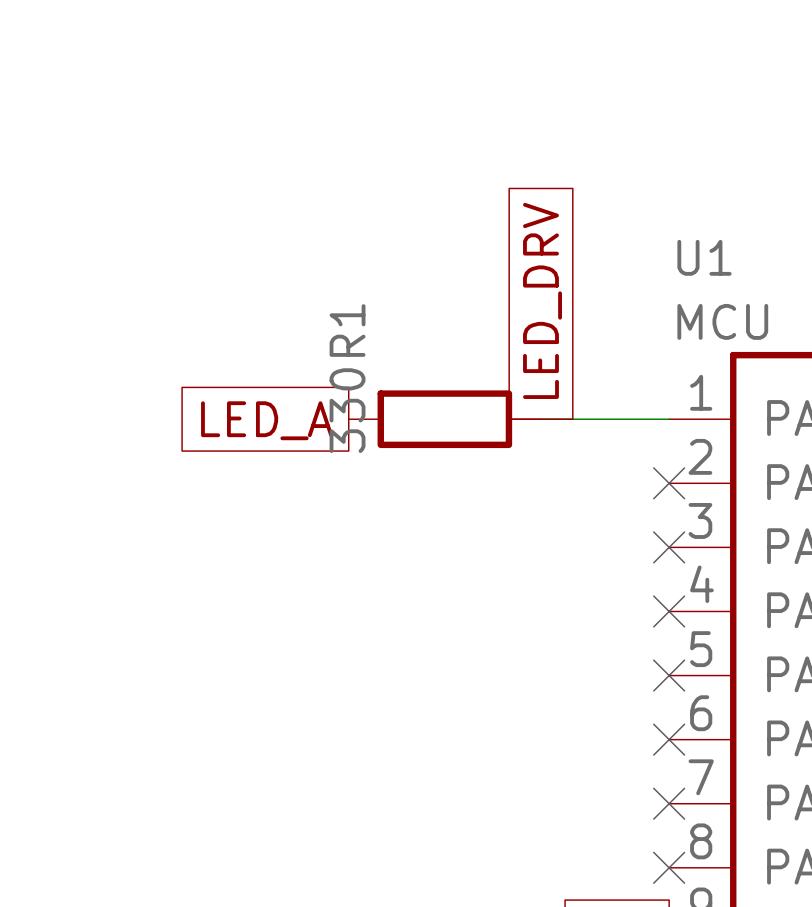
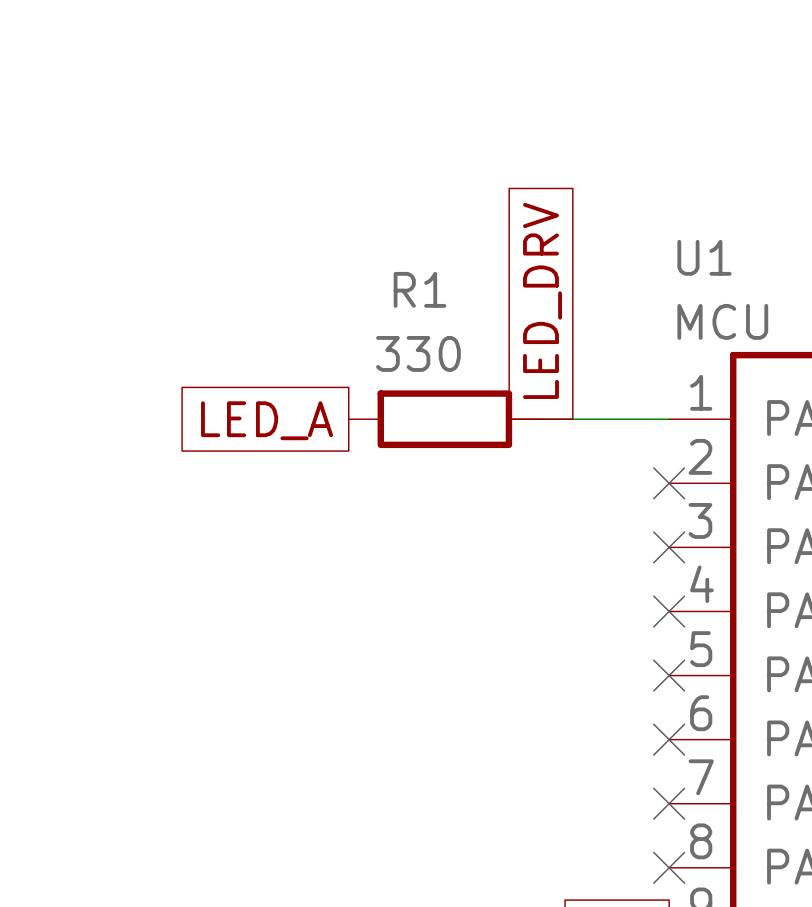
R1 name rotation: 0° (347, 330) -> 90° clockwise (419, 289)
R1 name position: R1 (347, 330) -> R1 (419, 289)
R1 value rotation: 0° (347, 410) -> 90° clockwise (418, 353)

